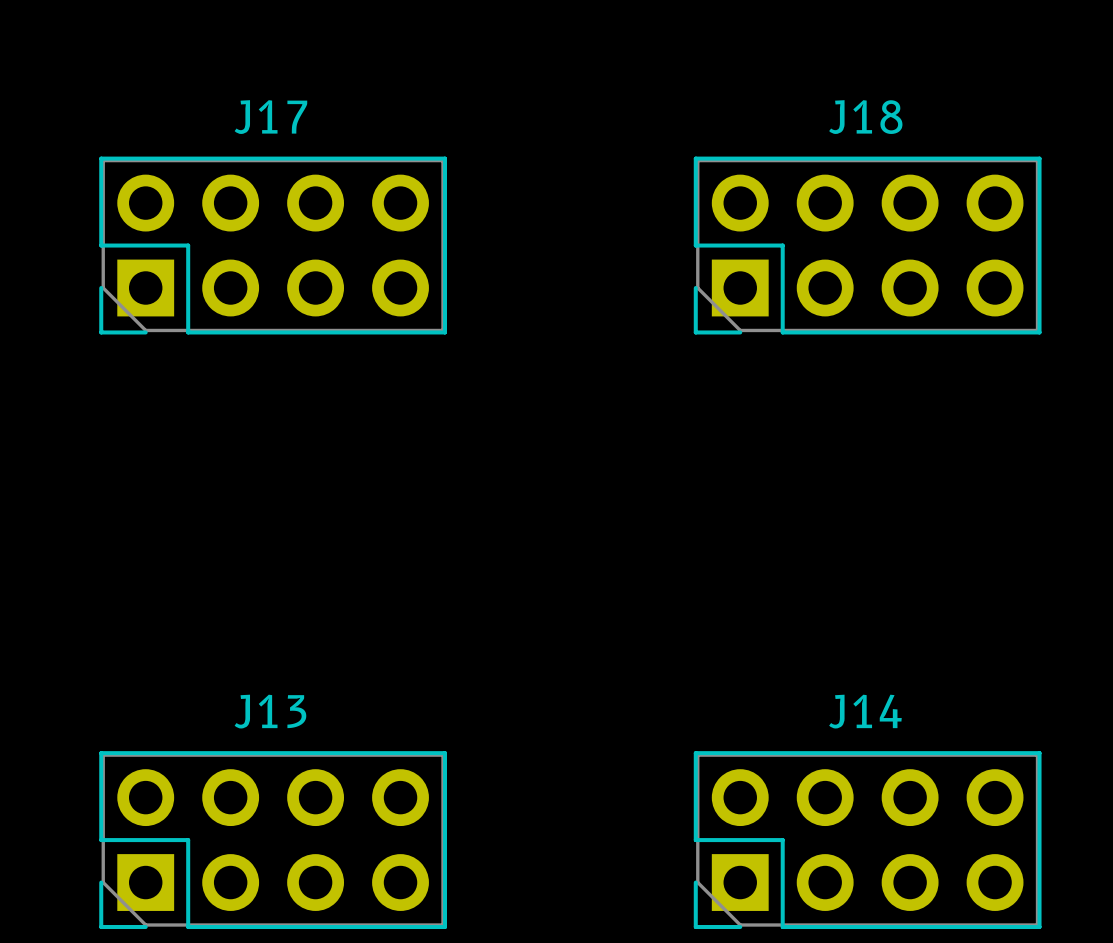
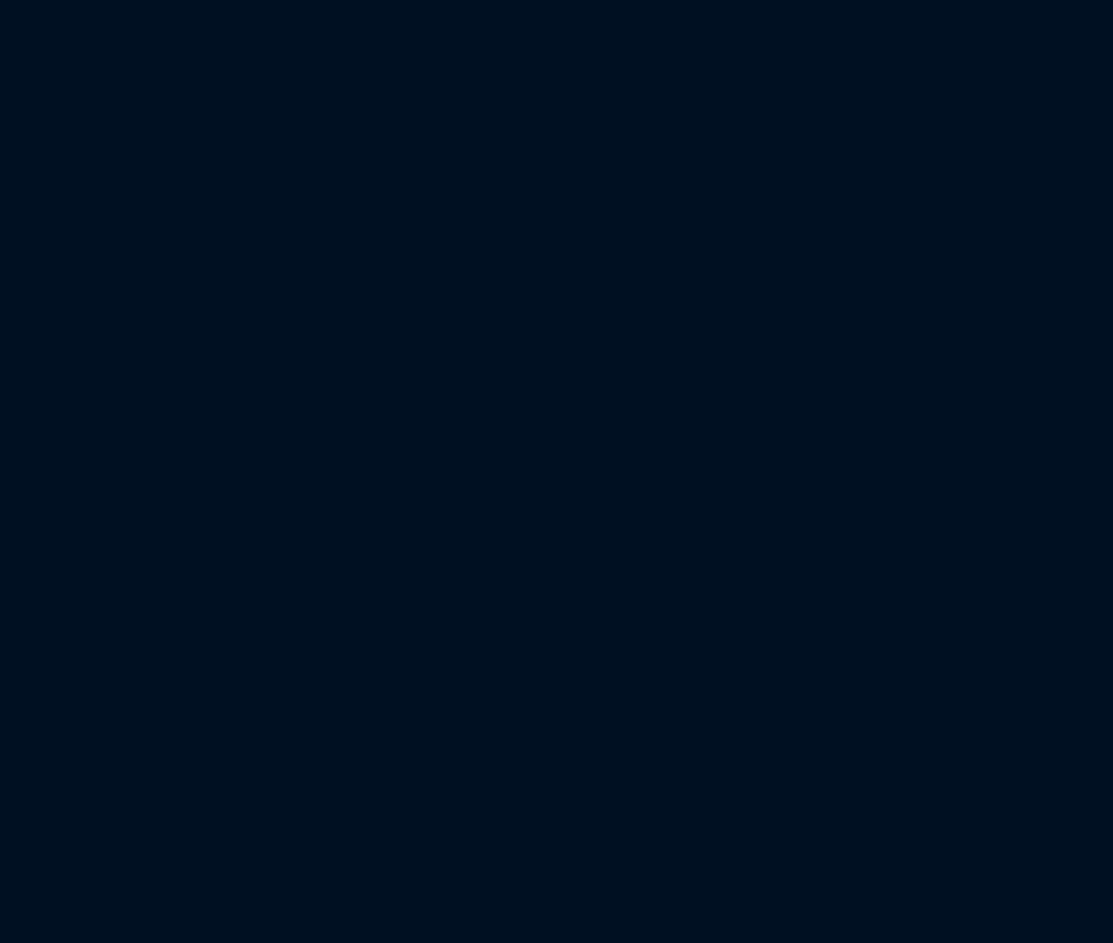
J17: (273, 245) -> none
J18: (867, 245) -> none
J13: (273, 840) -> none
J14: (867, 840) -> none

